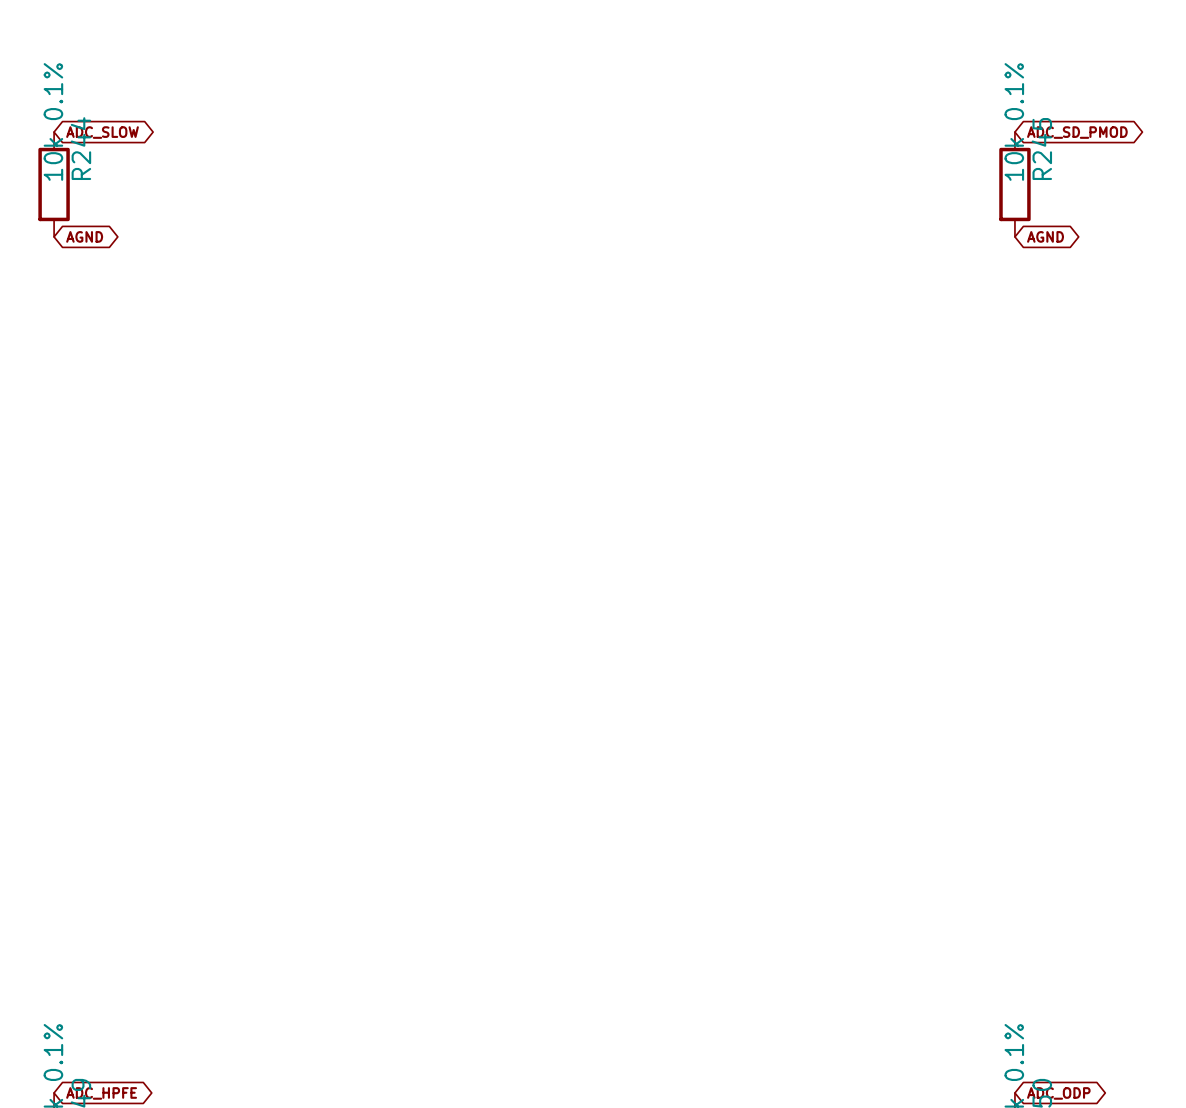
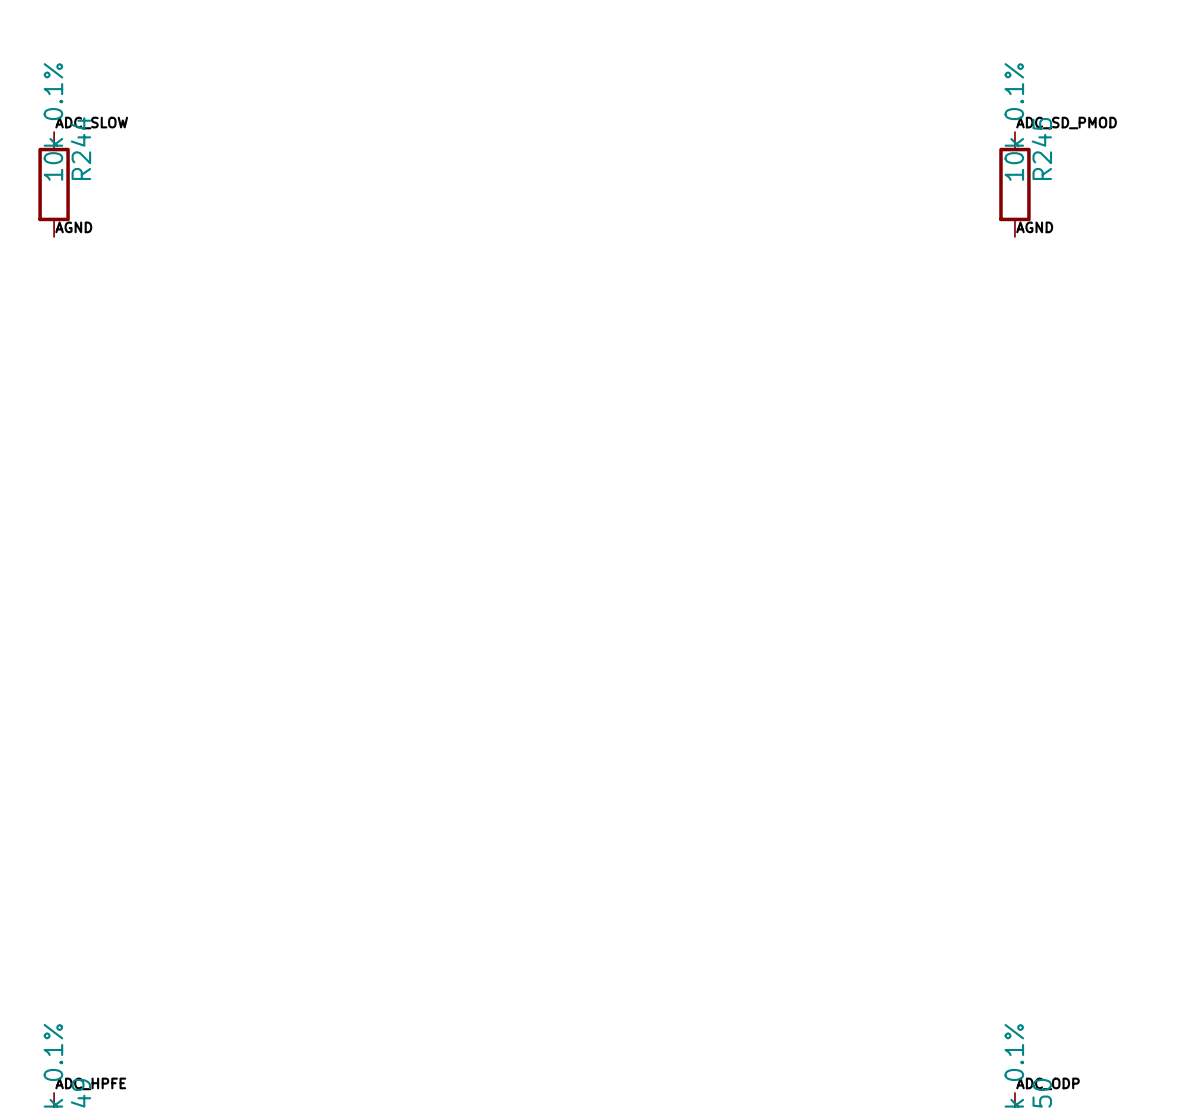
label: none -> ADC_SLOW (91, 123)
label: none -> ADC_SD_PMOD (1066, 123)
global label: ADC_SLOW (102, 132) -> none
global label: ADC_SD_PMOD (1077, 132) -> none
label: none -> AGND (73, 227)
label: none -> AGND (1034, 227)
global label: AGND (84, 236) -> none
global label: AGND (1045, 236) -> none
label: none -> ADC_HPFE (90, 1083)
label: none -> ADC_ODP (1047, 1083)
global label: ADC_HPFE (101, 1093) -> none
global label: ADC_ODP (1058, 1093) -> none

